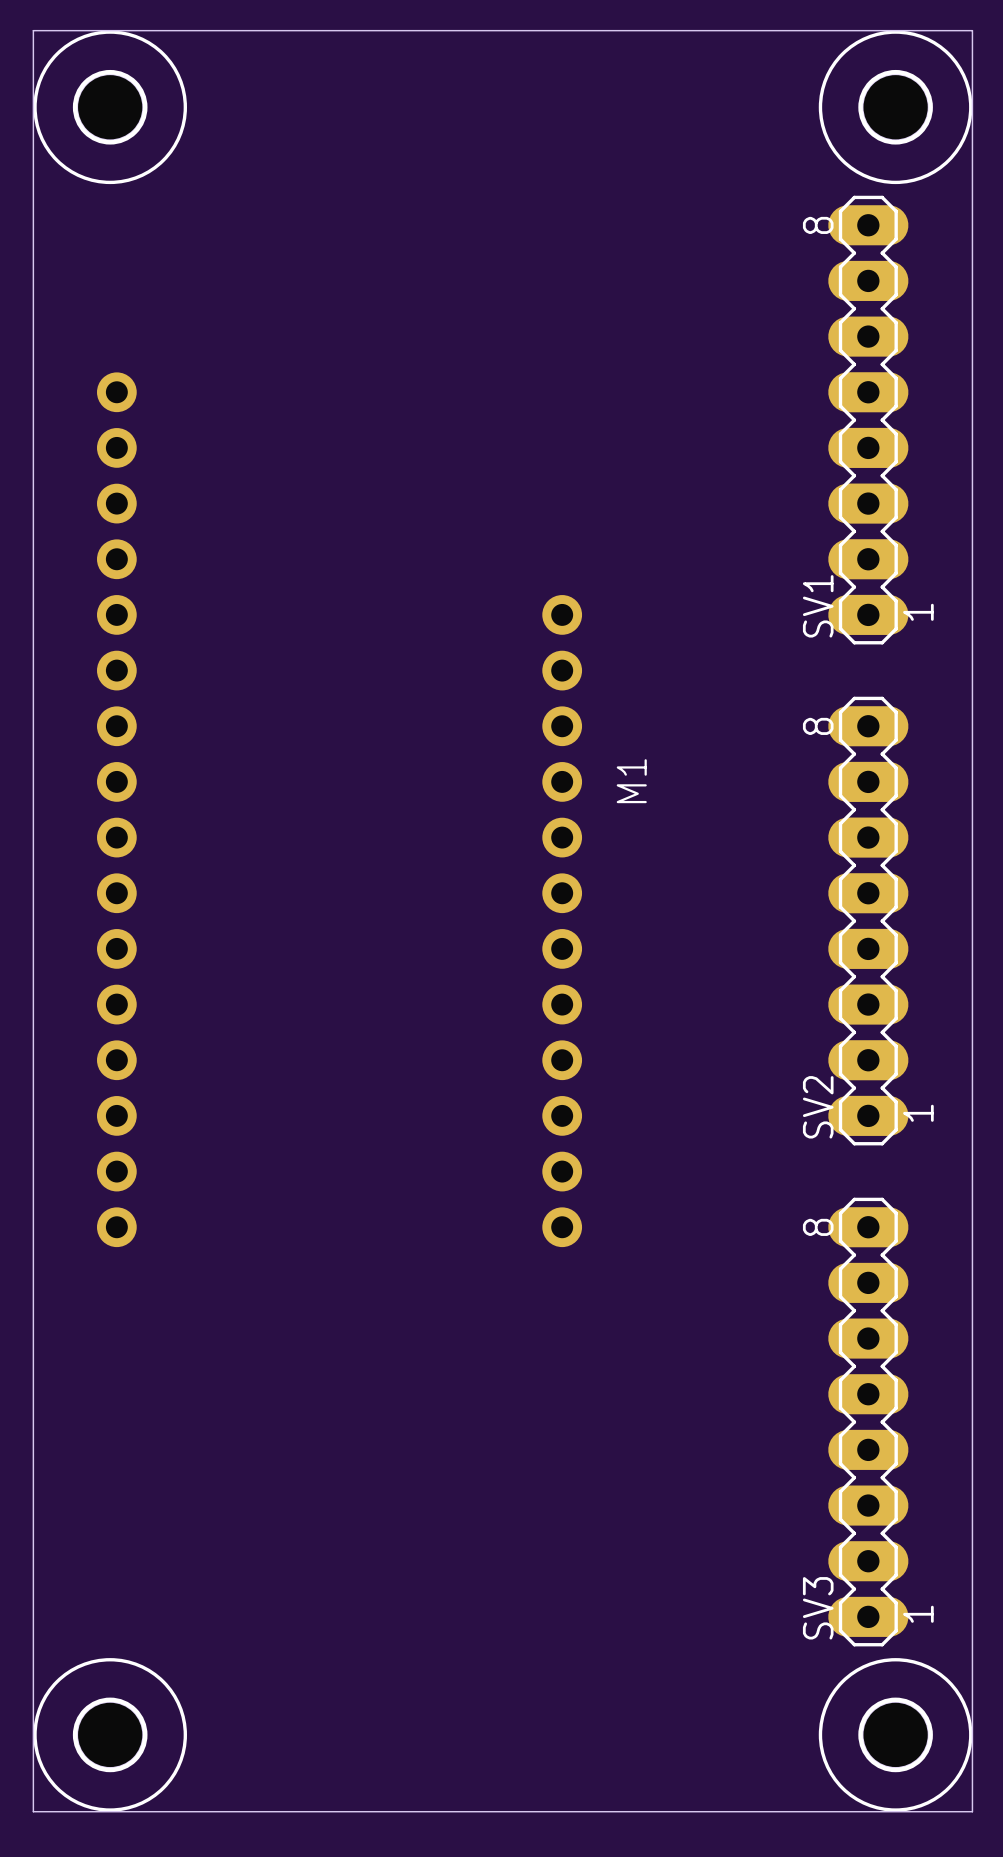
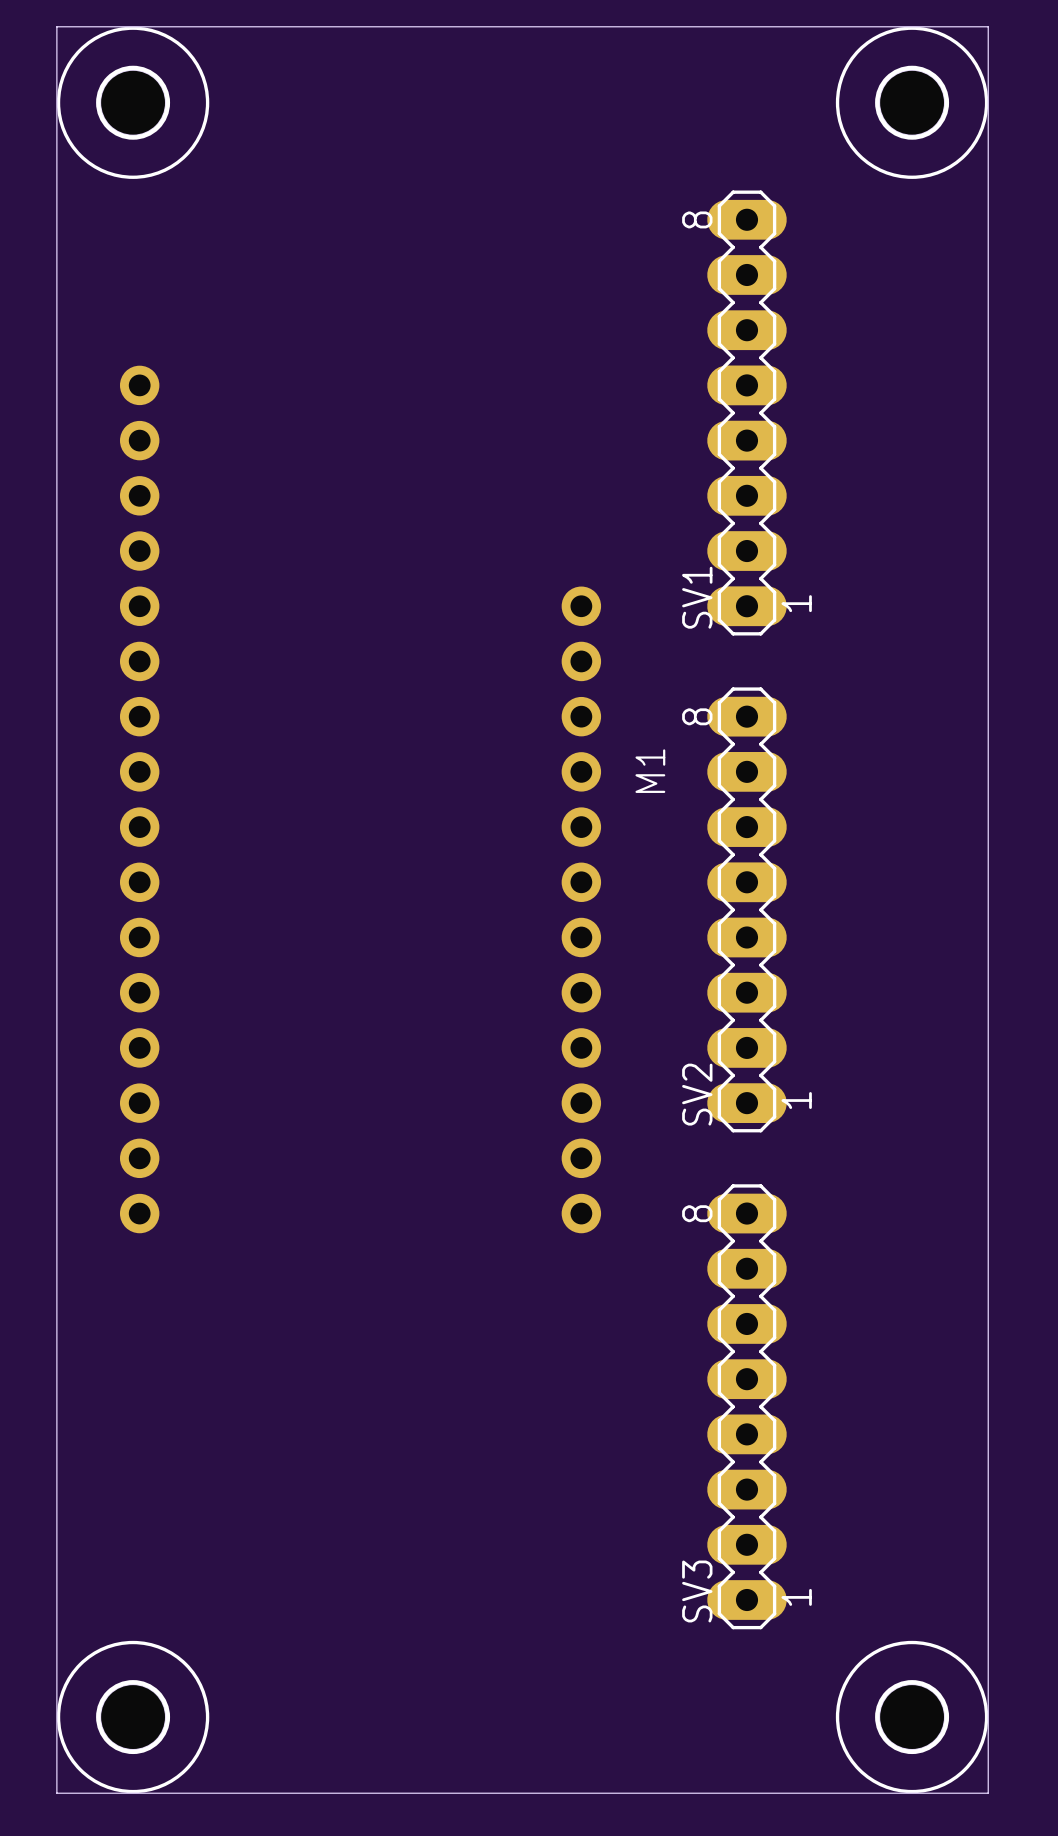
SV1 position: (868, 420) -> (746, 413)
SV2 position: (868, 921) -> (746, 909)
SV3 position: (868, 1422) -> (746, 1406)

